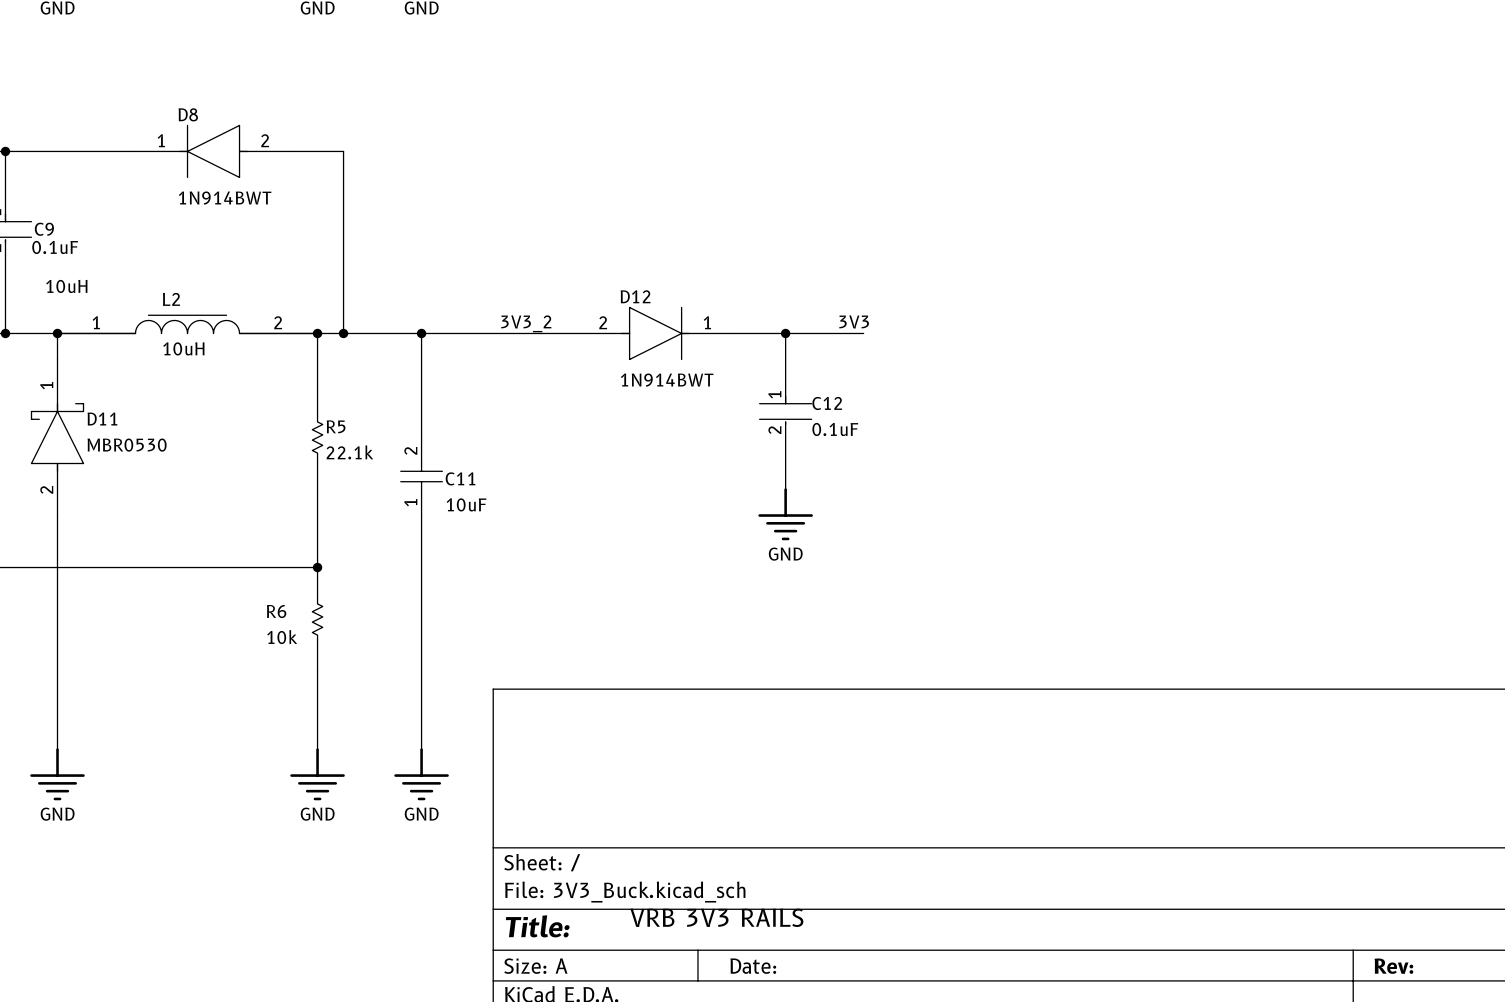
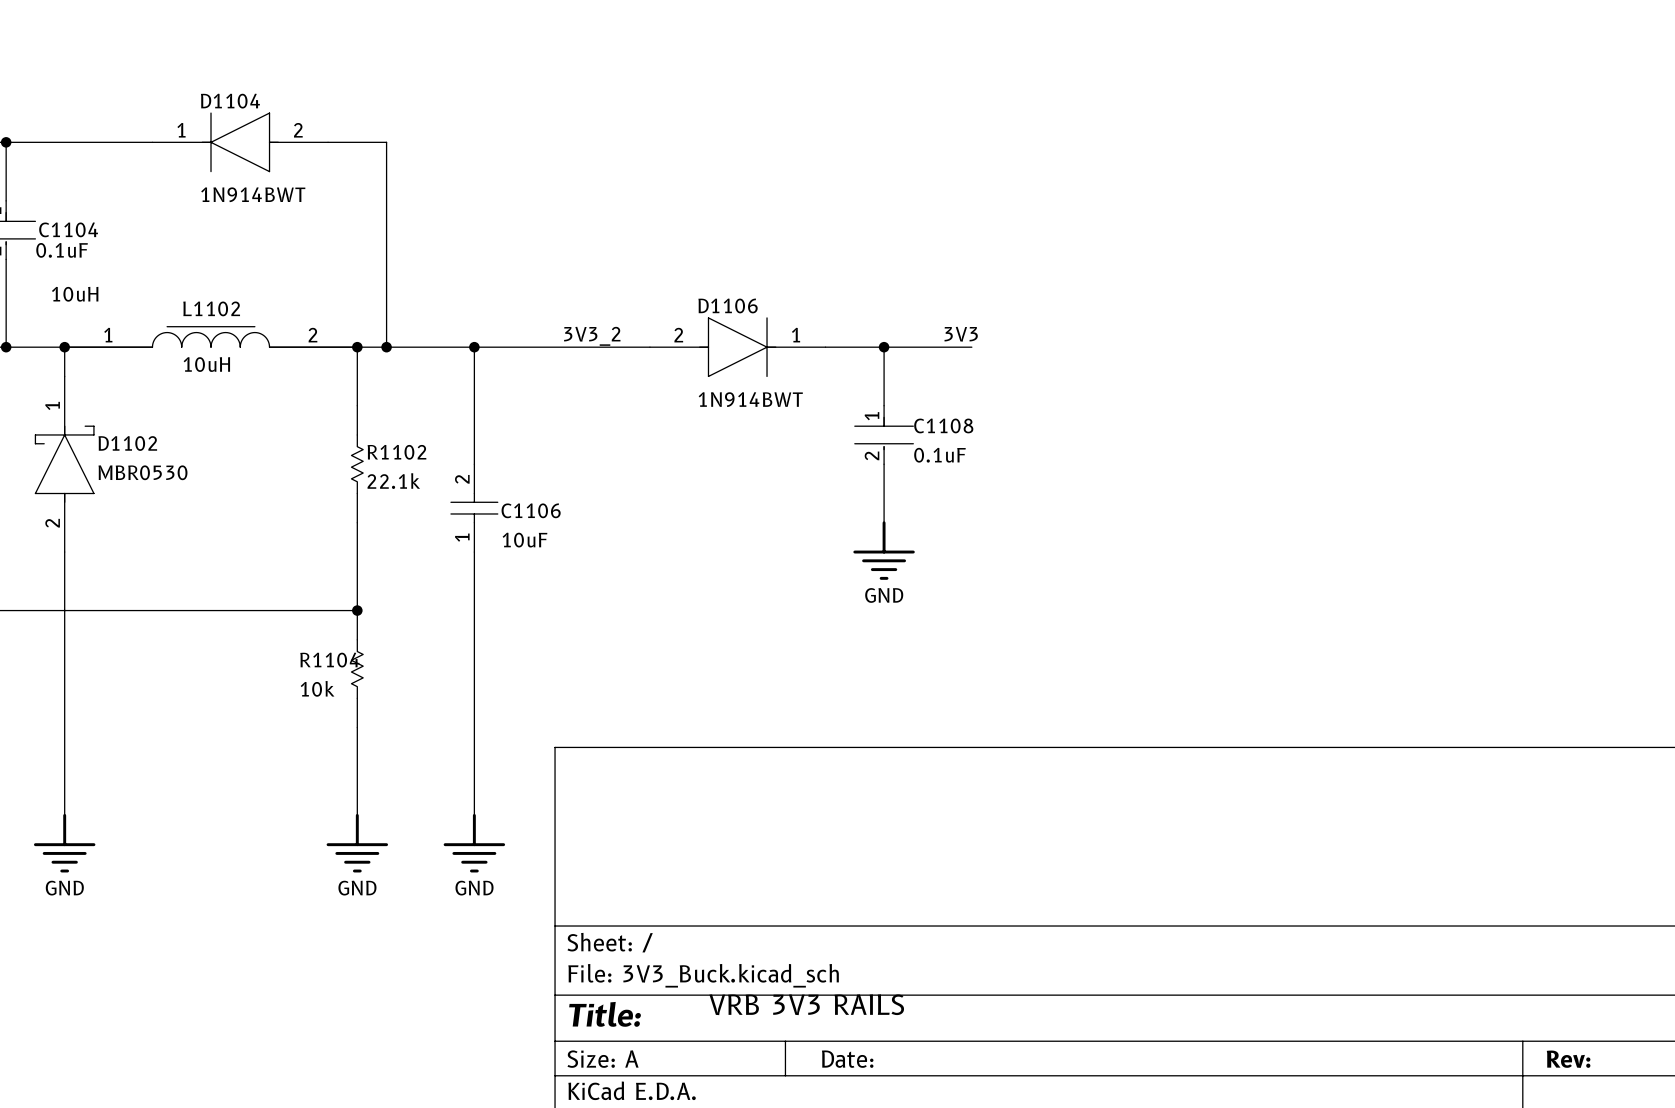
D8 name: D8 (188, 114) -> D1104 (230, 101)
C9 name: C9 (44, 229) -> C1104 (68, 229)
D12 name: D12 (635, 296) -> D1106 (728, 305)
L2 name: L2 (171, 299) -> L1102 (211, 308)
C12 name: C12 (827, 403) -> C1108 (943, 425)
D11 name: D11 (102, 419) -> D1102 (127, 443)
R5 name: R5 (336, 426) -> R1102 (396, 452)
C11 name: C11 (460, 478) -> C1106 (531, 510)
R6 name: R6 (276, 611) -> R1104 (329, 660)

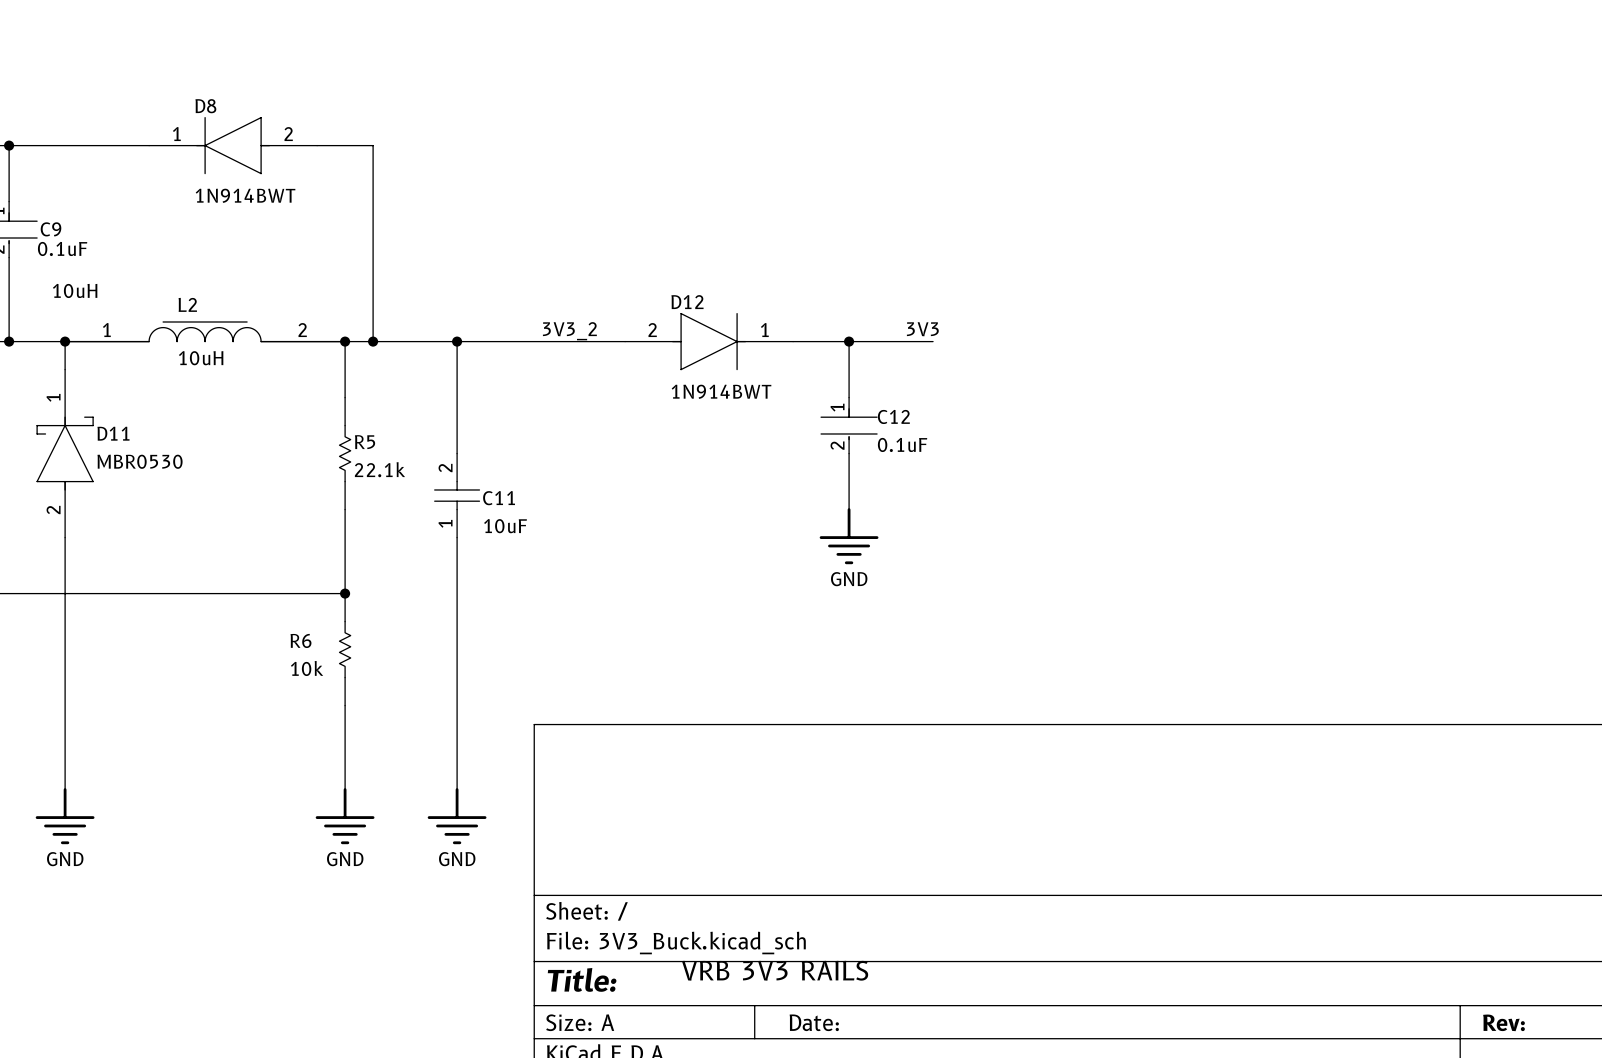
D1104 name: D1104 (230, 101) -> D8 (205, 106)
C1104 name: C1104 (68, 229) -> C9 (51, 229)
D1106 name: D1106 (728, 305) -> D12 (687, 302)
L1102 name: L1102 (211, 308) -> L2 (187, 304)
C1108 name: C1108 (943, 425) -> C12 (893, 416)
D1102 name: D1102 (127, 443) -> D11 (113, 433)
R1102 name: R1102 (396, 452) -> R5 (365, 442)
C1106 name: C1106 (531, 510) -> C11 (499, 498)
R1104 name: R1104 (329, 660) -> R6 (300, 640)

